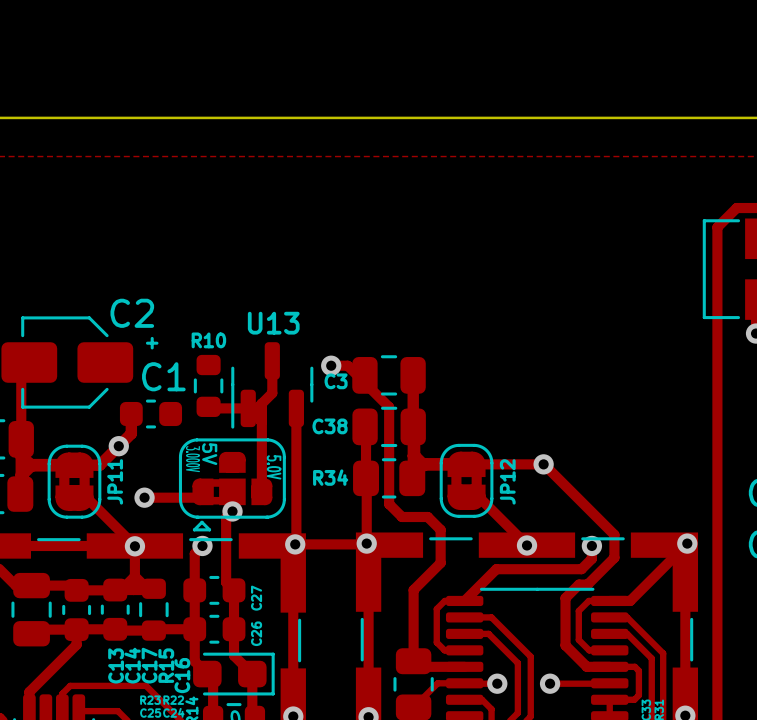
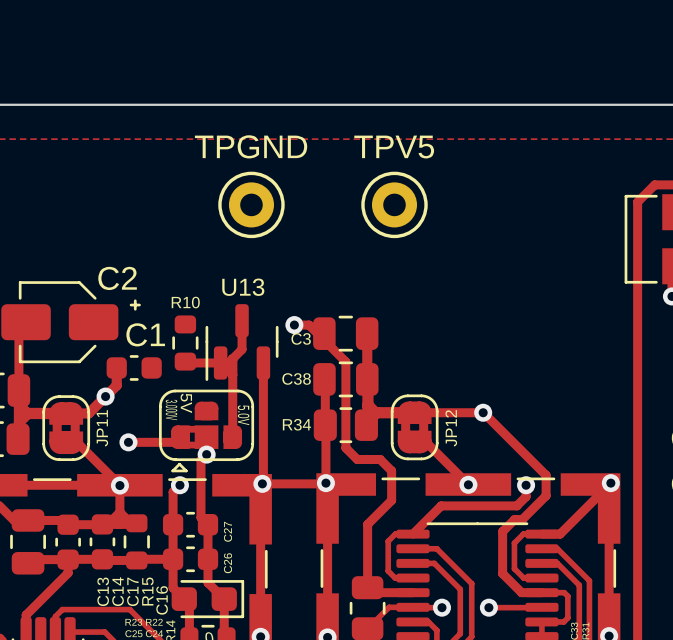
text: none -> TPGND (251, 146)
part: none -> (251, 204)
TPV5: none -> (394, 204)

